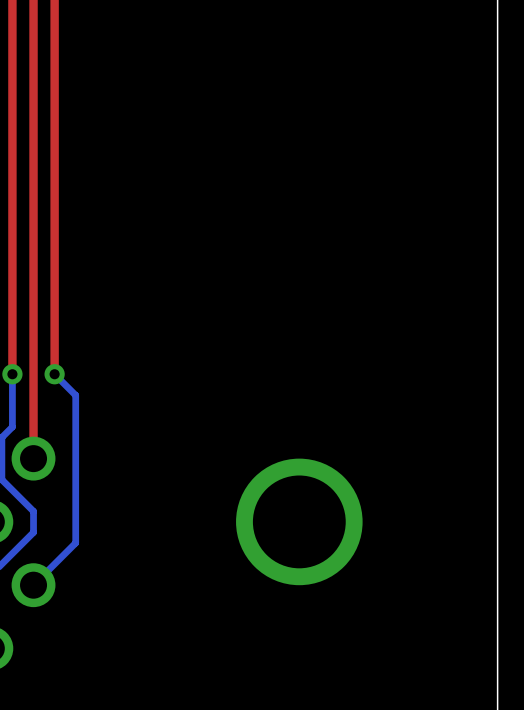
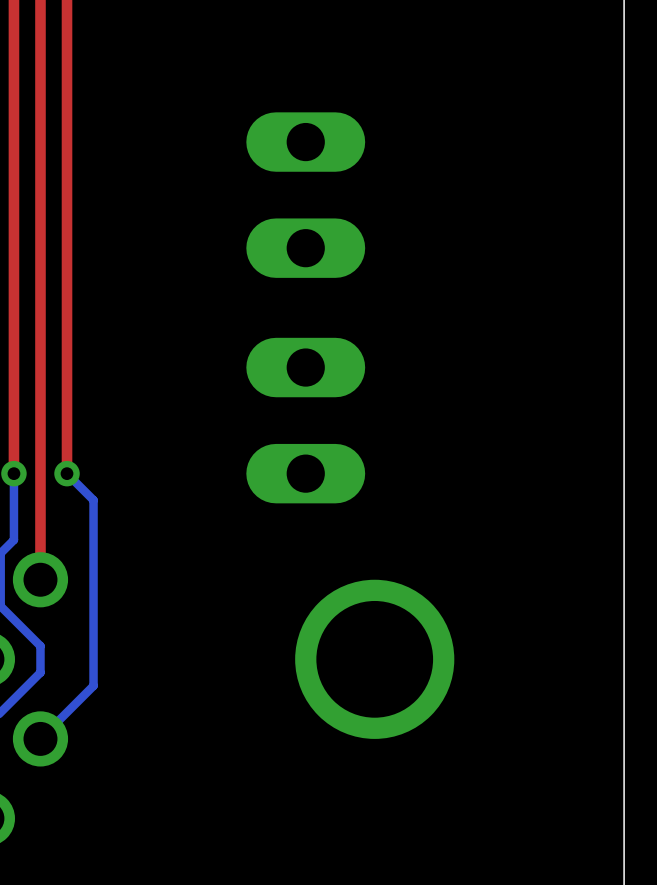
part: none -> (305, 195)
part: none -> (305, 420)

